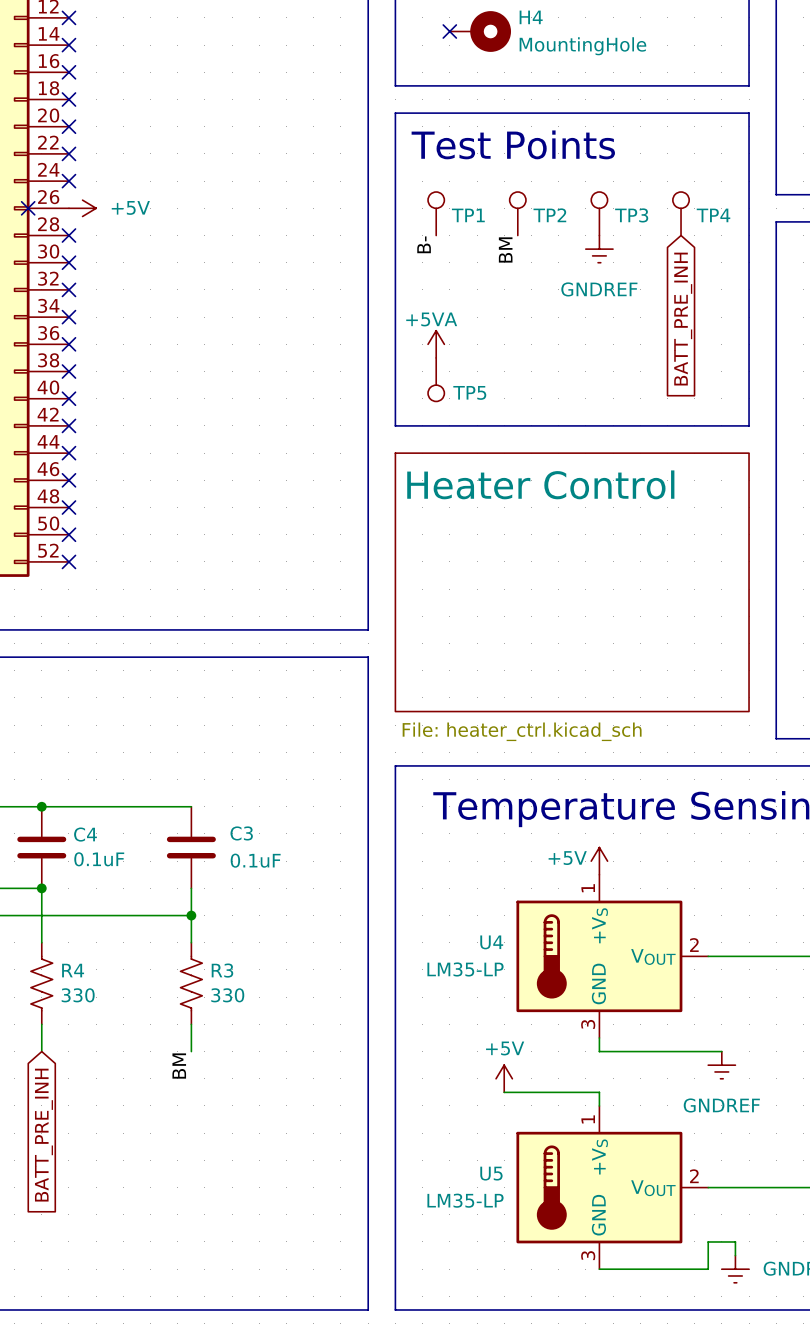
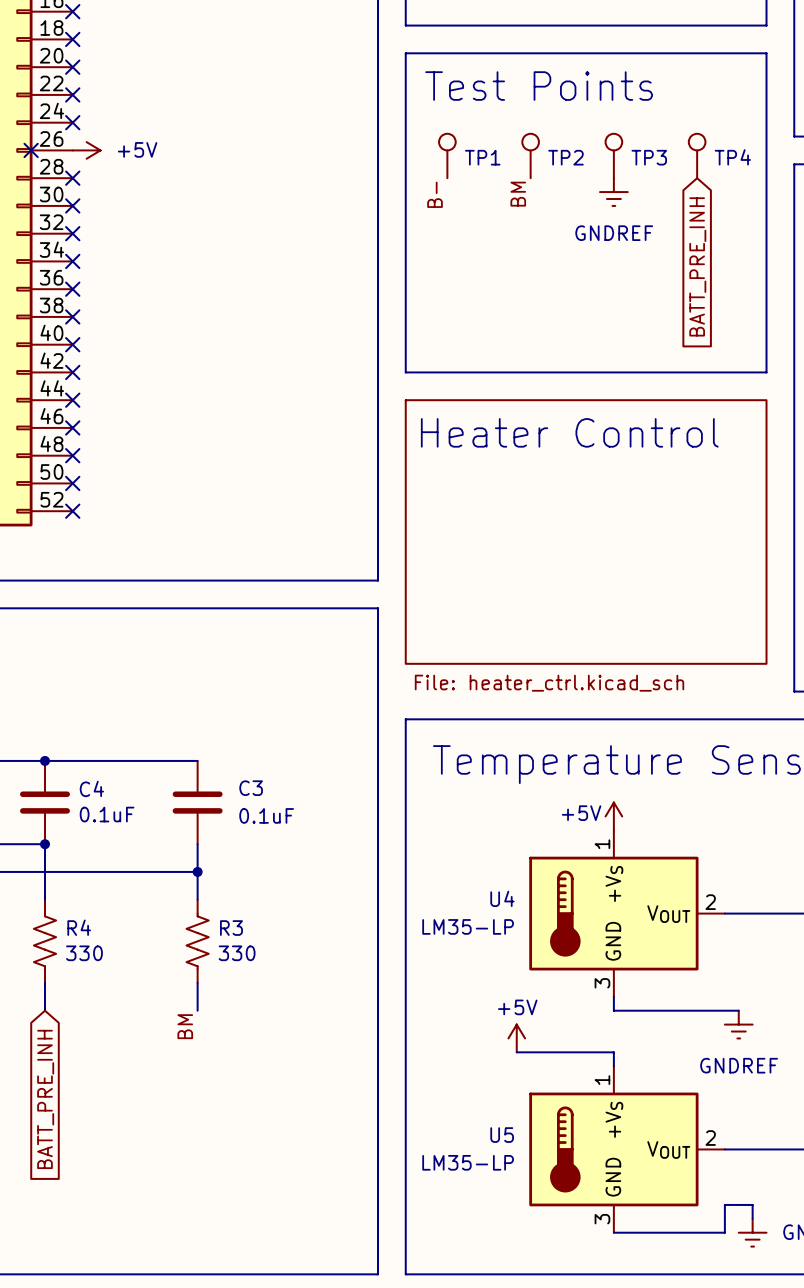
power symbol: +5VA (436, 344) -> none
TP5: (436, 379) -> none

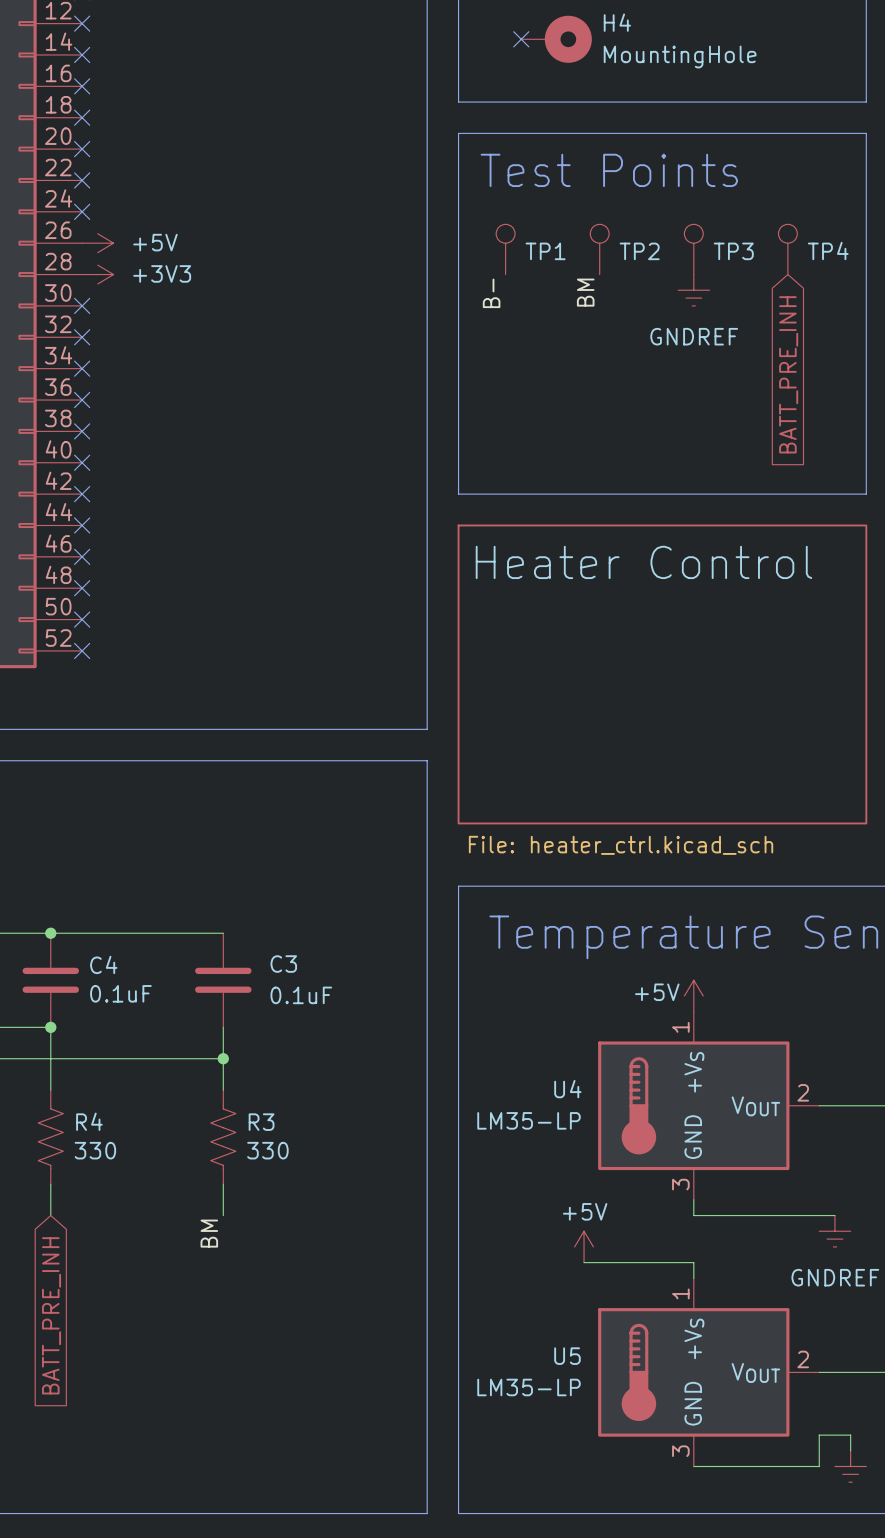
no-connect mark: (31, 150) -> none
no-connect mark: (72, 178) -> none
power symbol: none -> +3V3 (97, 274)

